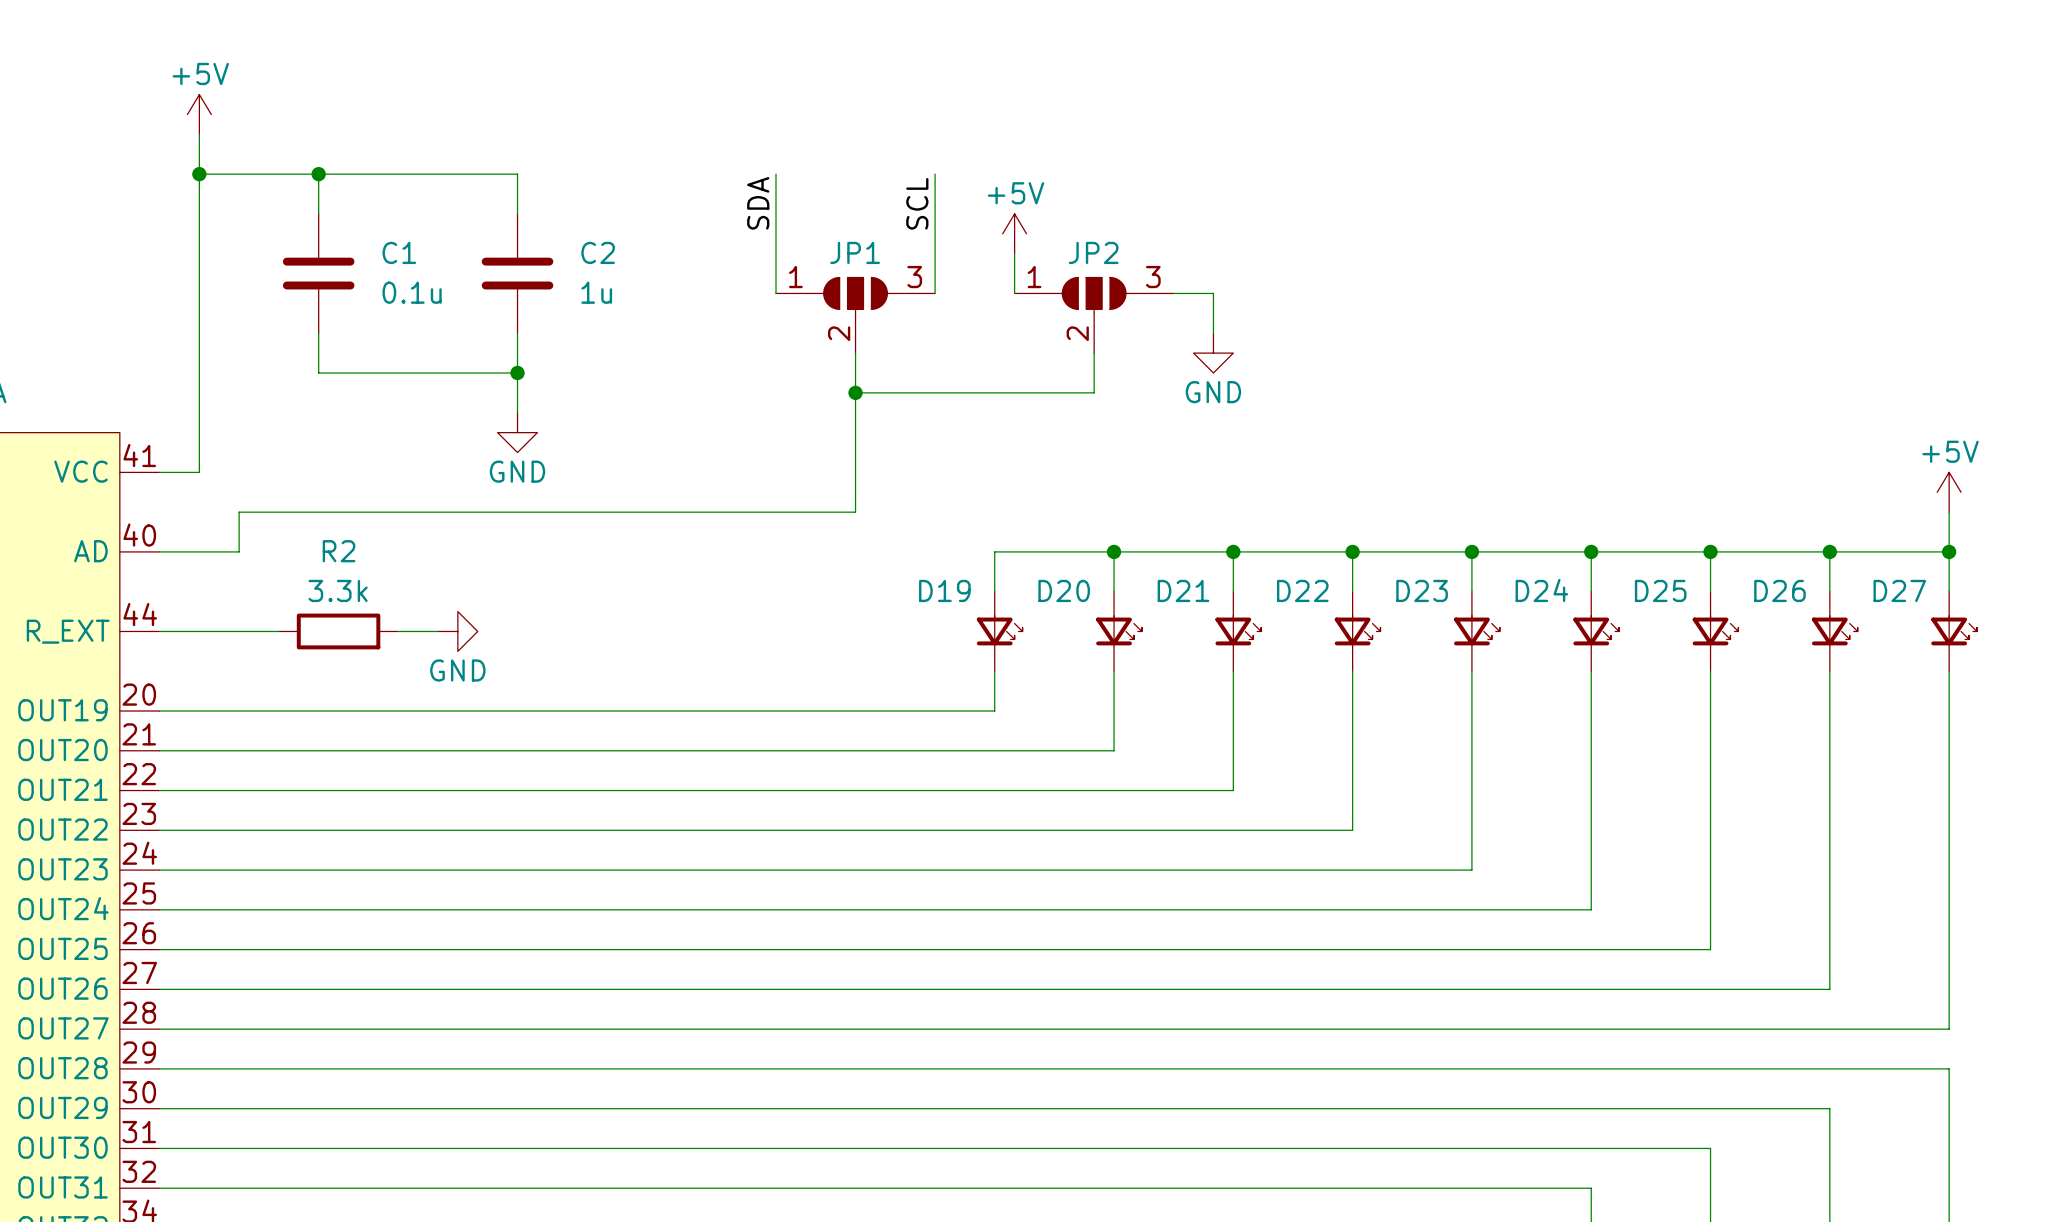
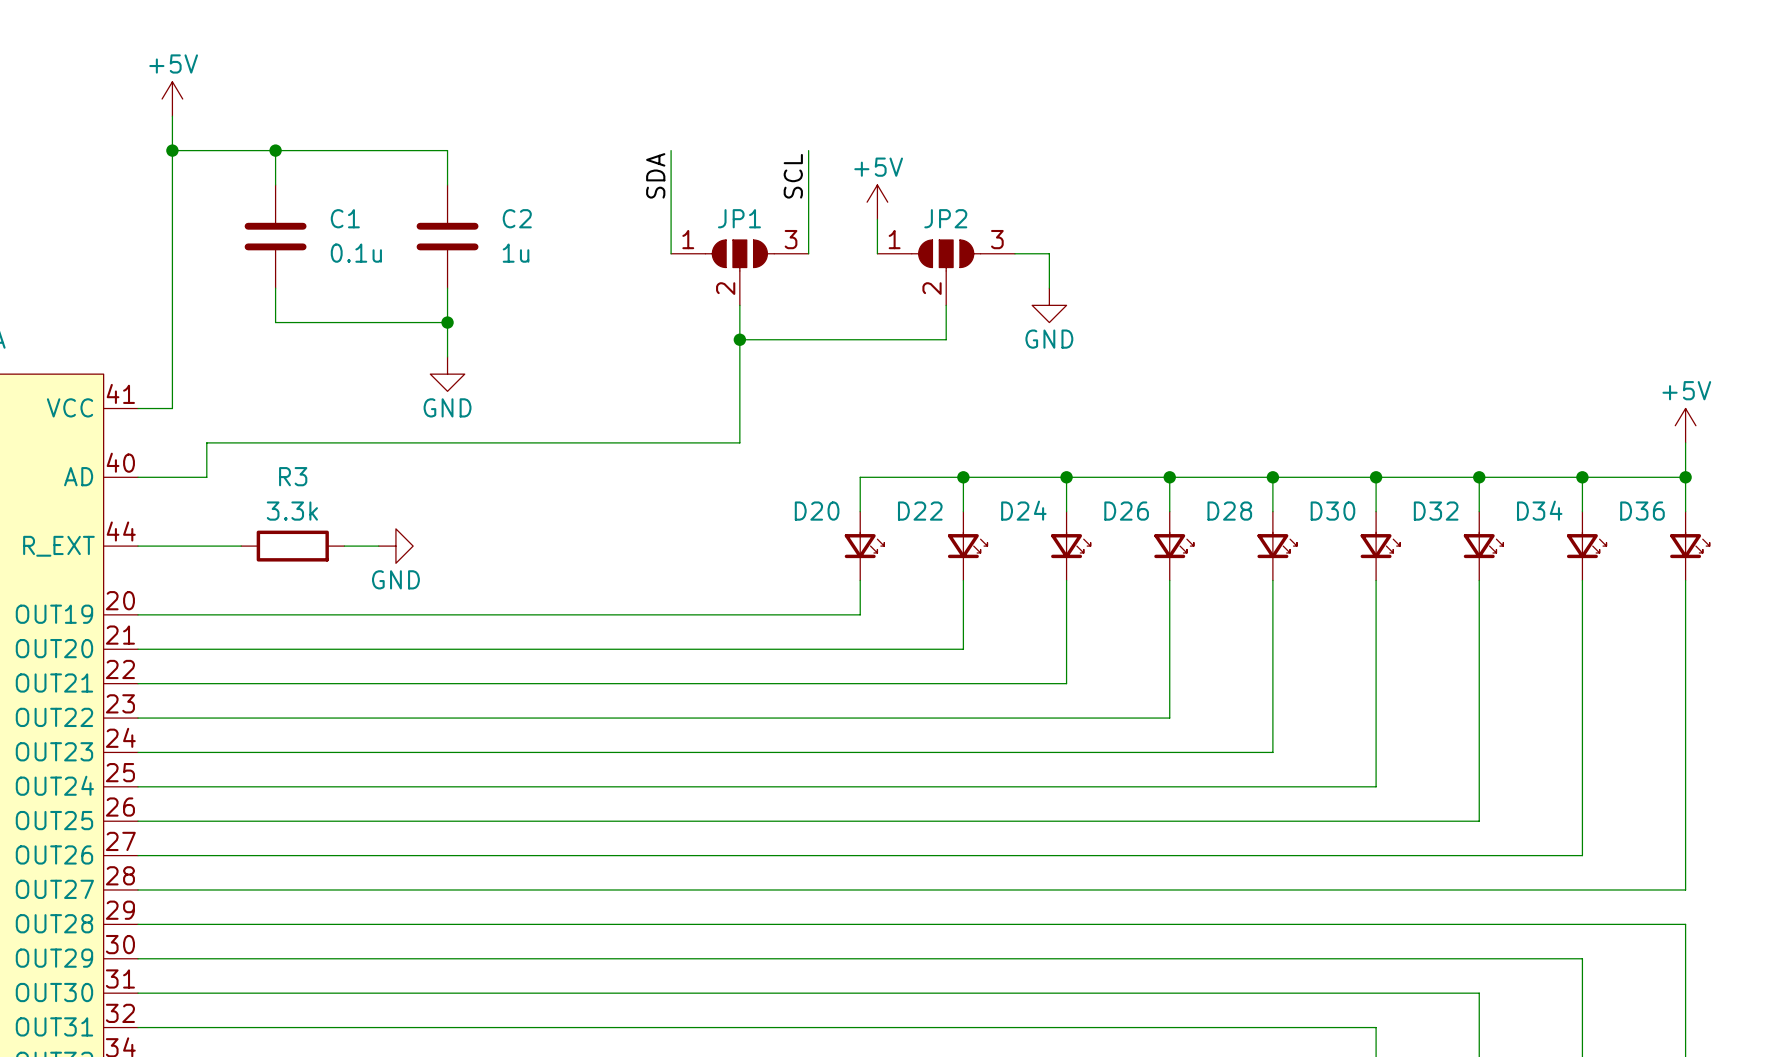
R2 name: R2 (339, 551) -> R3 (293, 476)
D19 name: D19 (944, 590) -> D20 (817, 511)
D20 name: D20 (1064, 590) -> D22 (920, 511)
D21 name: D21 (1183, 590) -> D24 (1023, 510)
D22 name: D22 (1302, 590) -> D26 (1126, 511)
D23 name: D23 (1422, 590) -> D28 (1229, 511)
D24 name: D24 (1541, 590) -> D30 (1332, 511)
D25 name: D25 (1660, 590) -> D32 (1436, 511)
D26 name: D26 (1779, 590) -> D34 (1539, 510)
D27 name: D27 (1899, 590) -> D36 (1642, 511)

